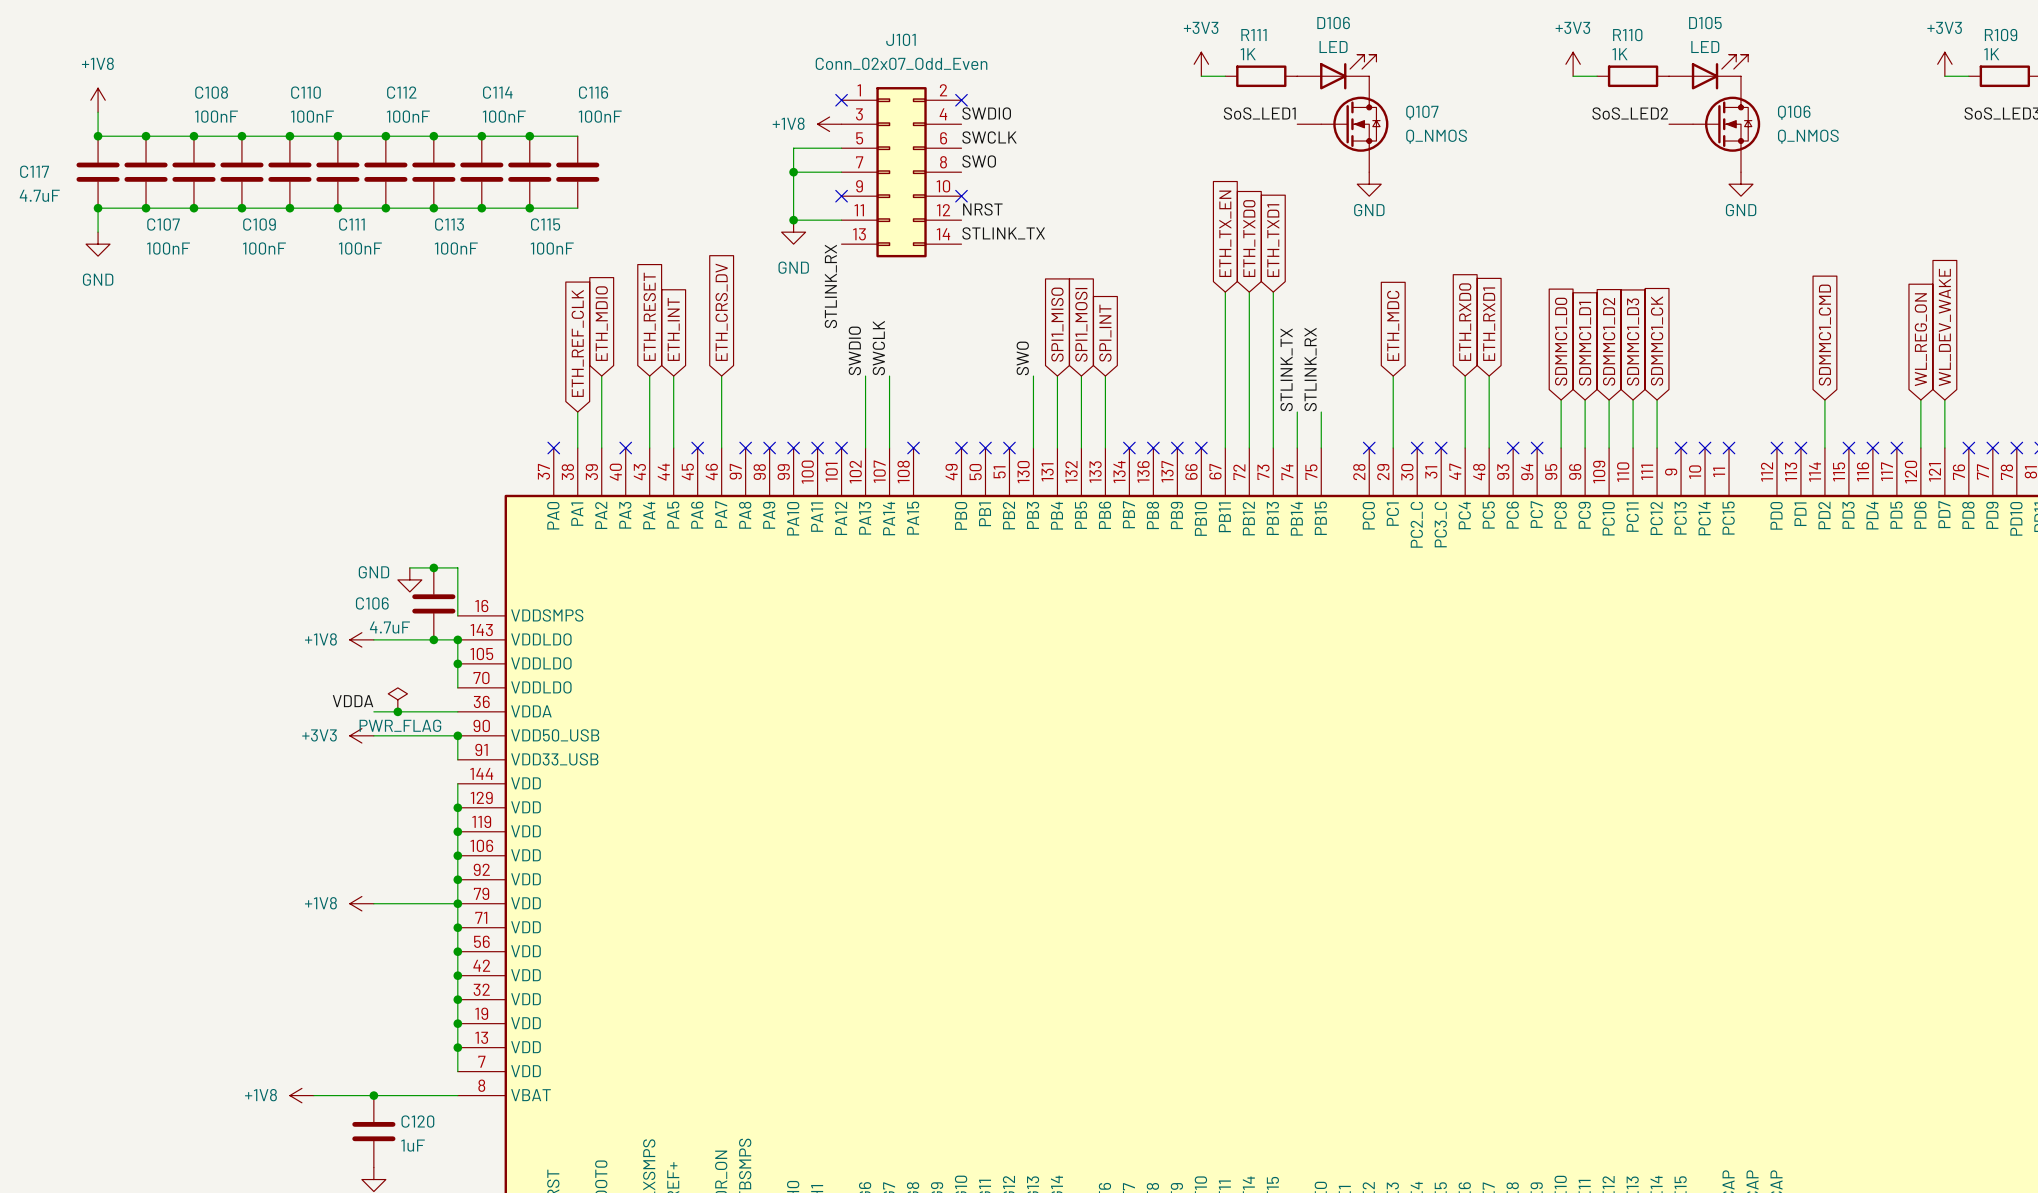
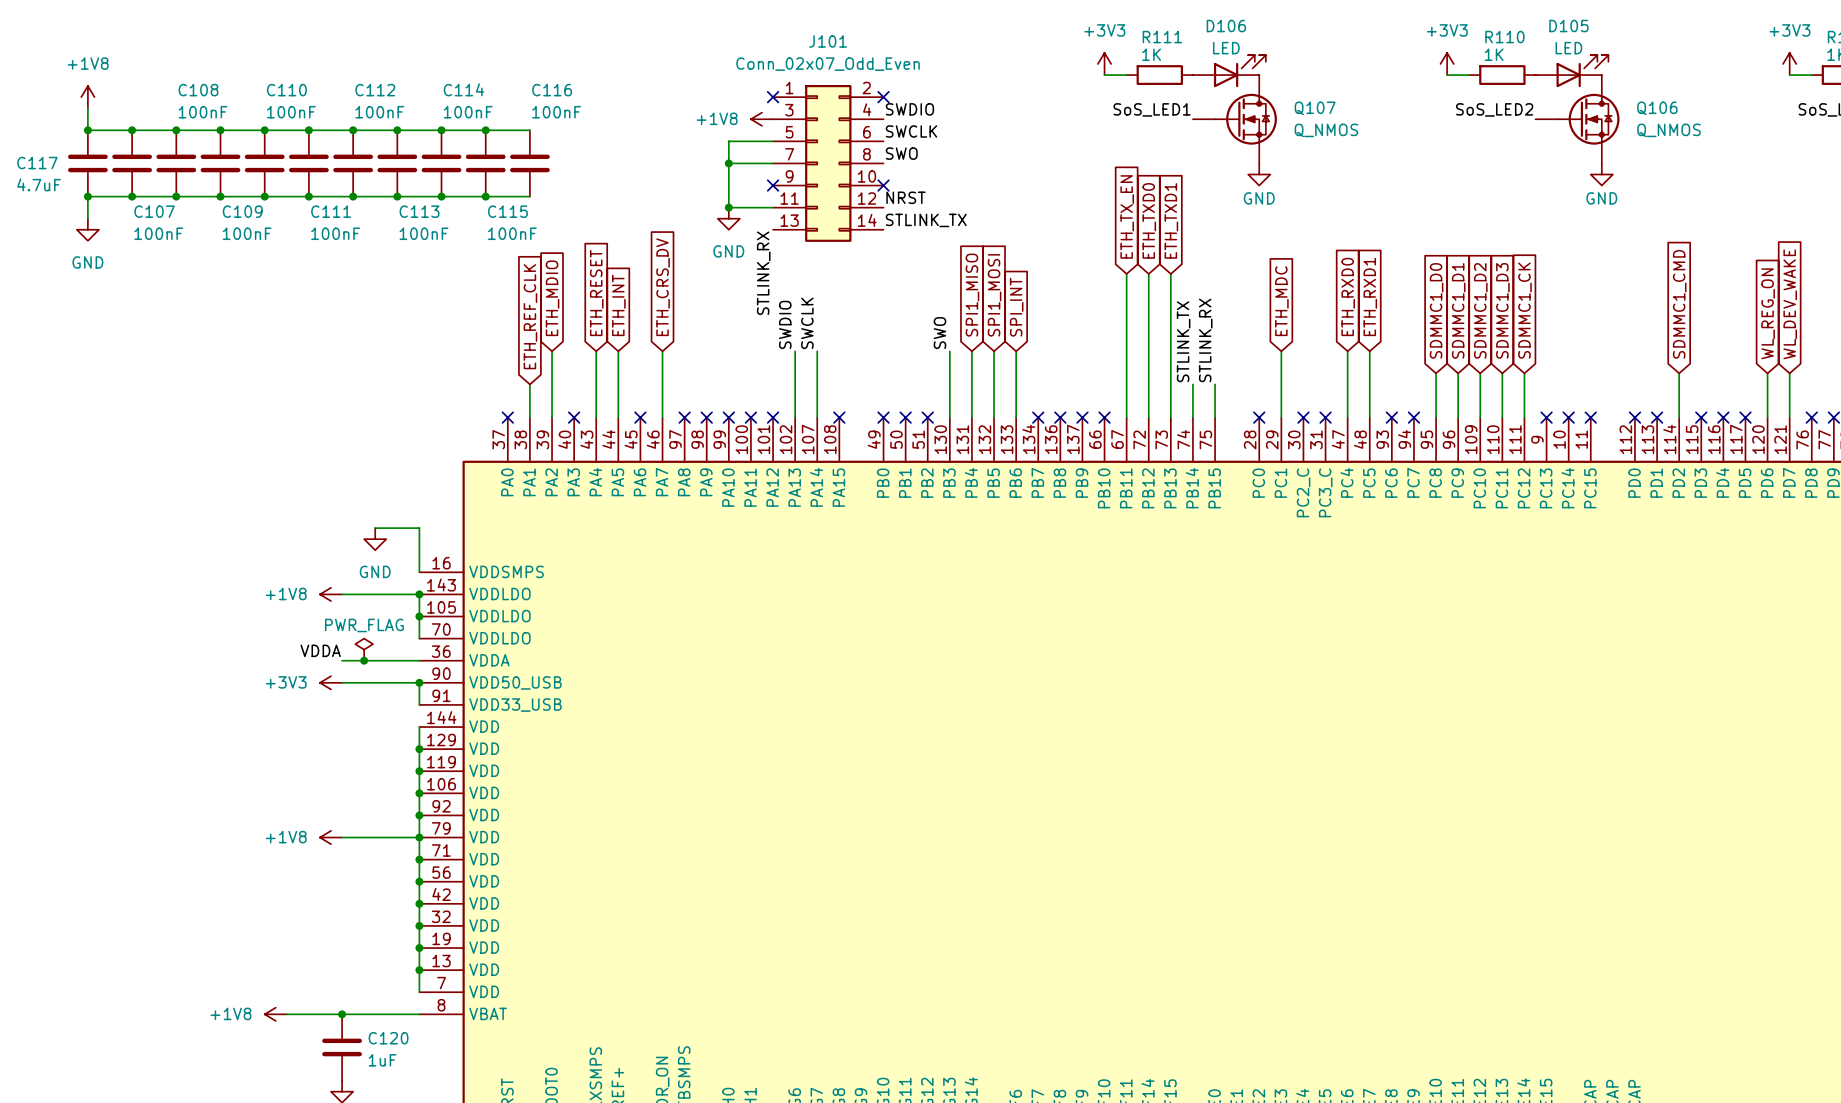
junction: (433, 567) -> none
power symbol text position: GND (373, 572) -> GND (375, 571)
C106: 4.7uF (433, 603) -> none
junction: (433, 639) -> none
power symbol text position: PWR_FLAG (400, 725) -> PWR_FLAG (364, 625)

